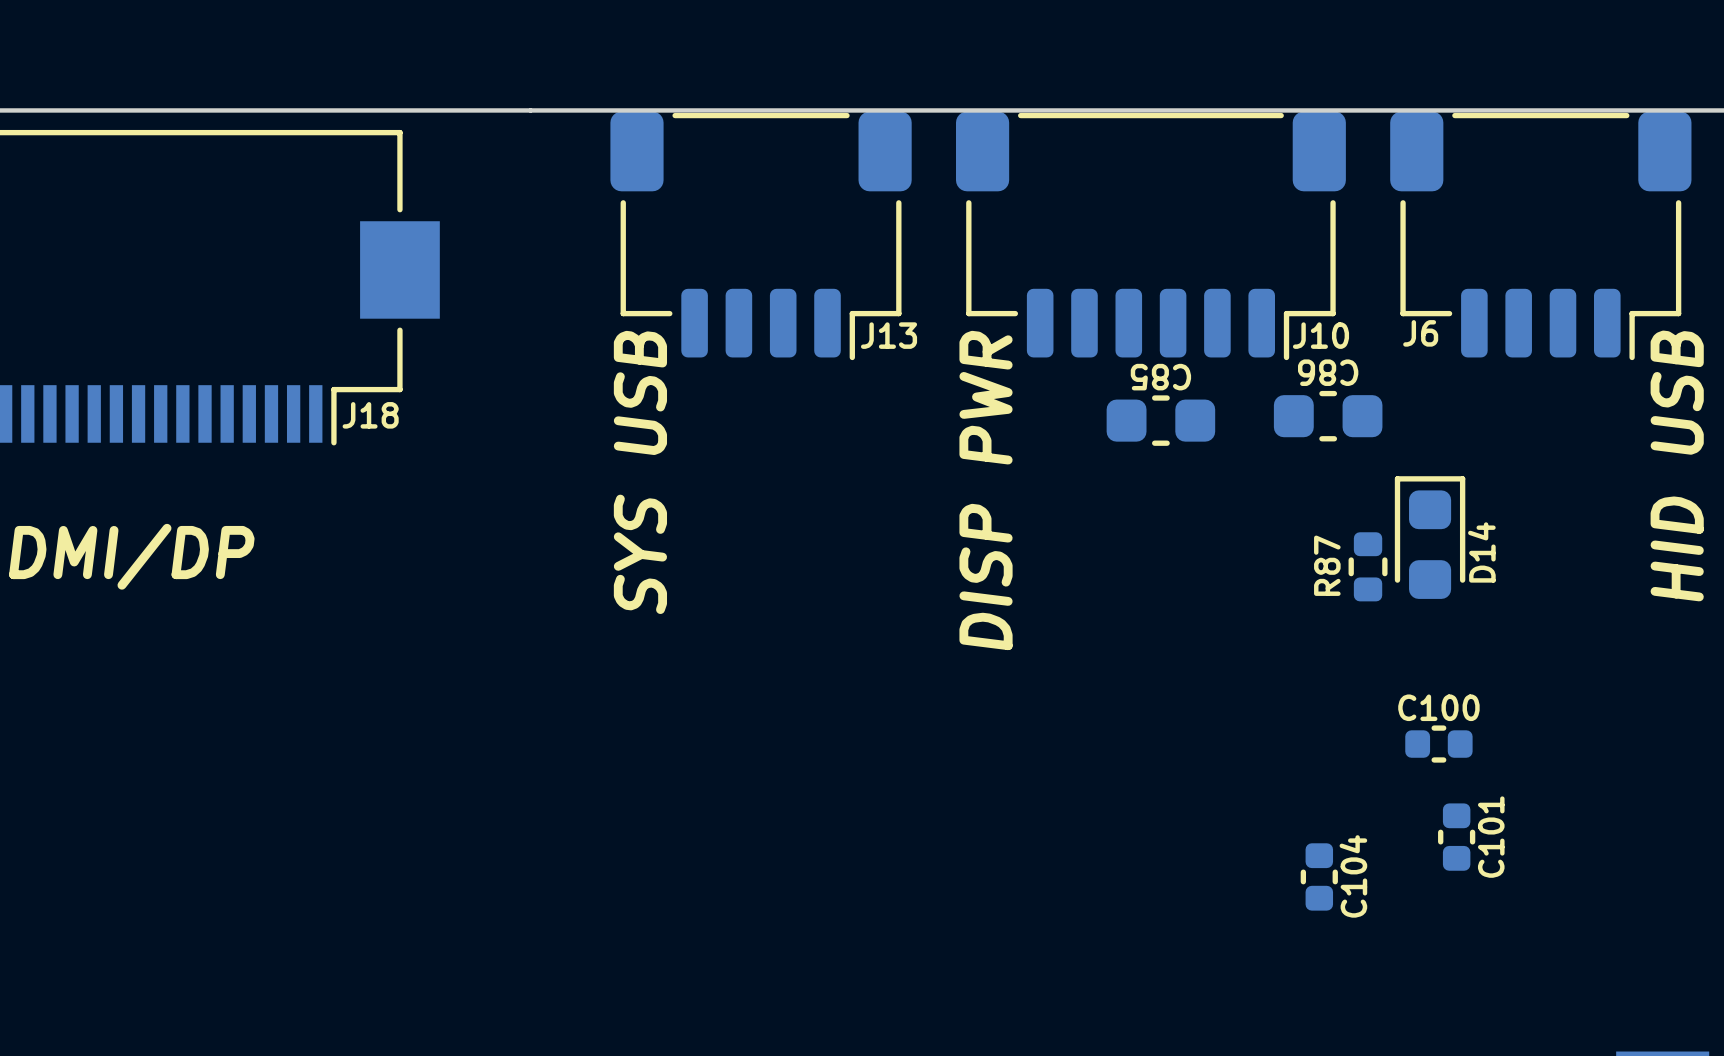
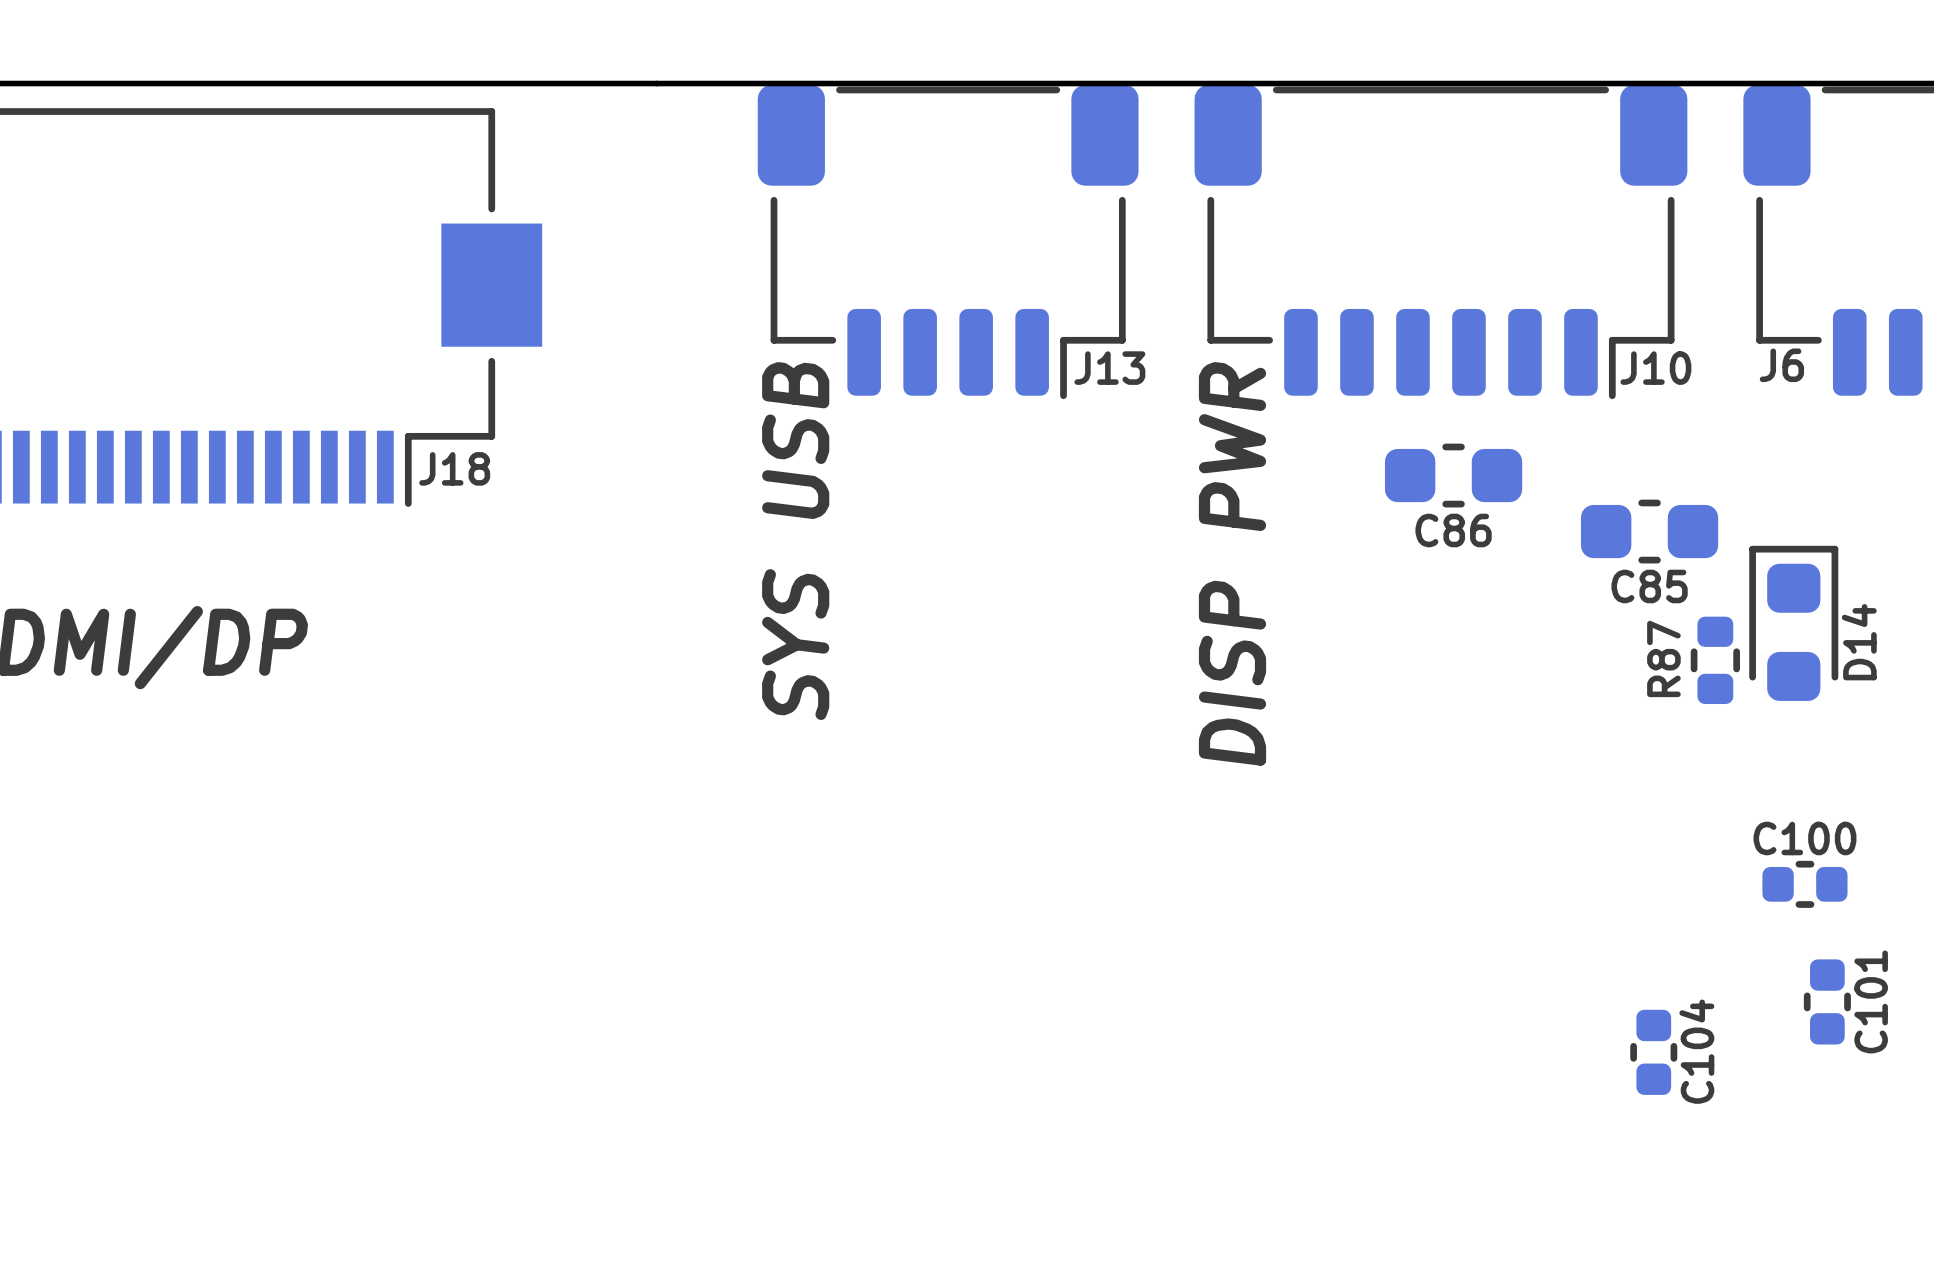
C85 name: C85 (1160, 377) -> C86 (1453, 530)
C86: (1328, 416) -> none
C85: none -> (1649, 531)

